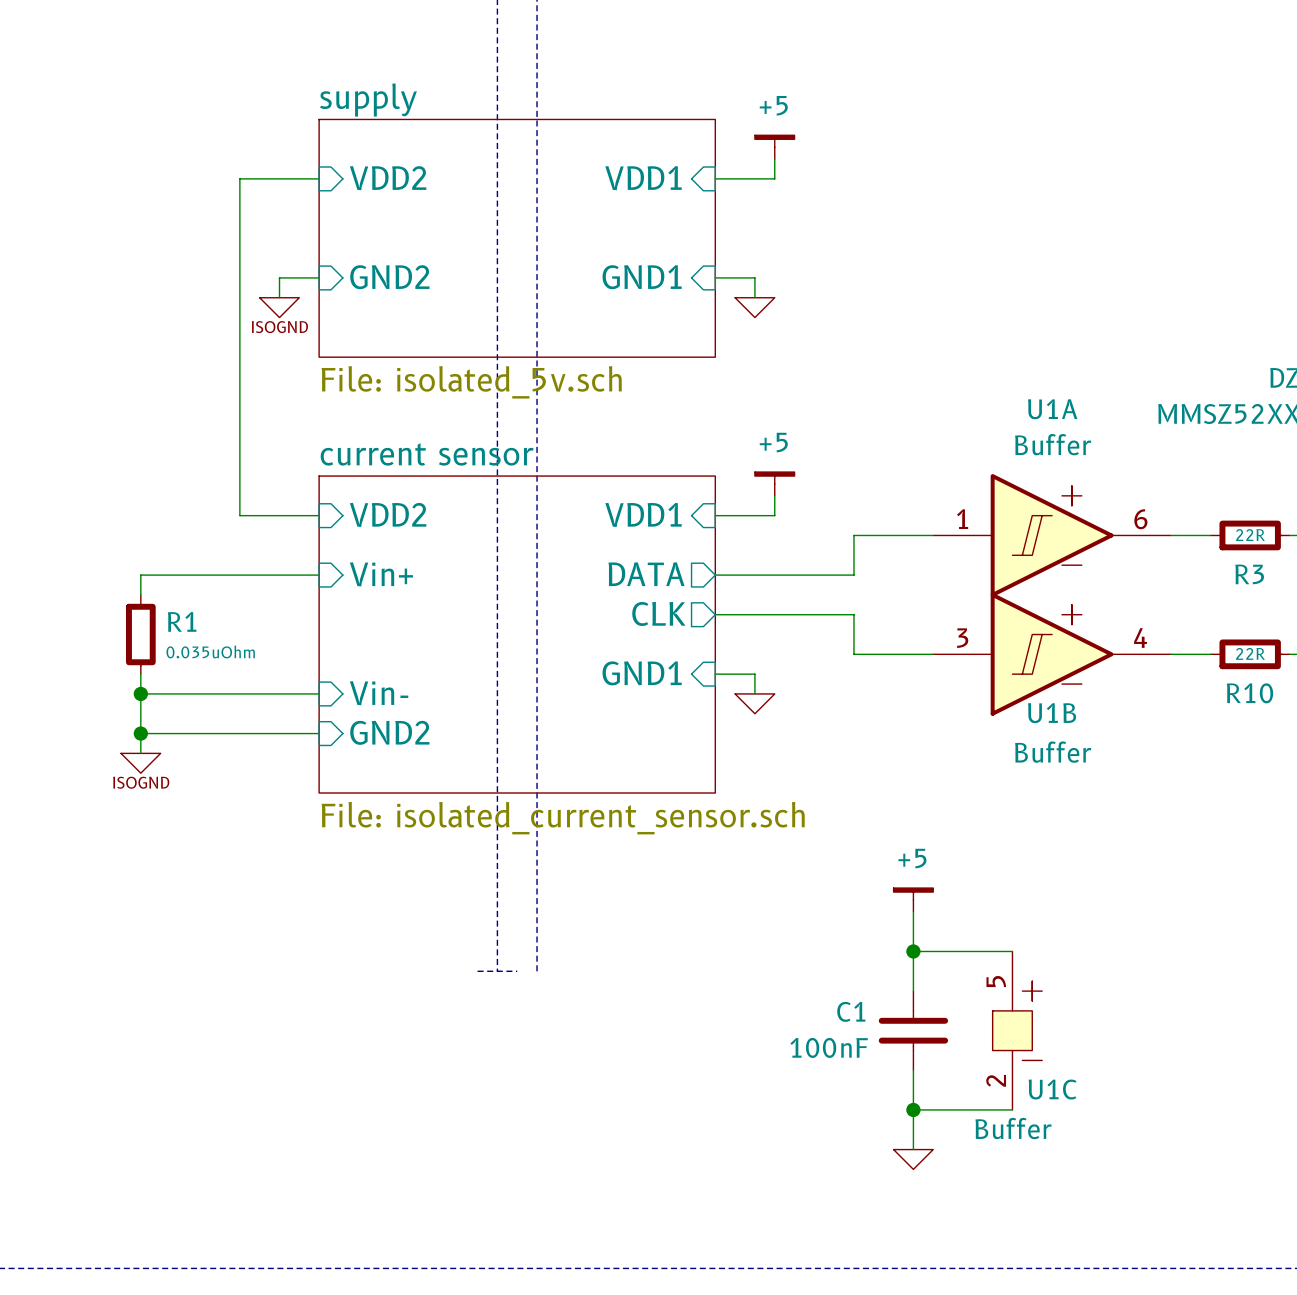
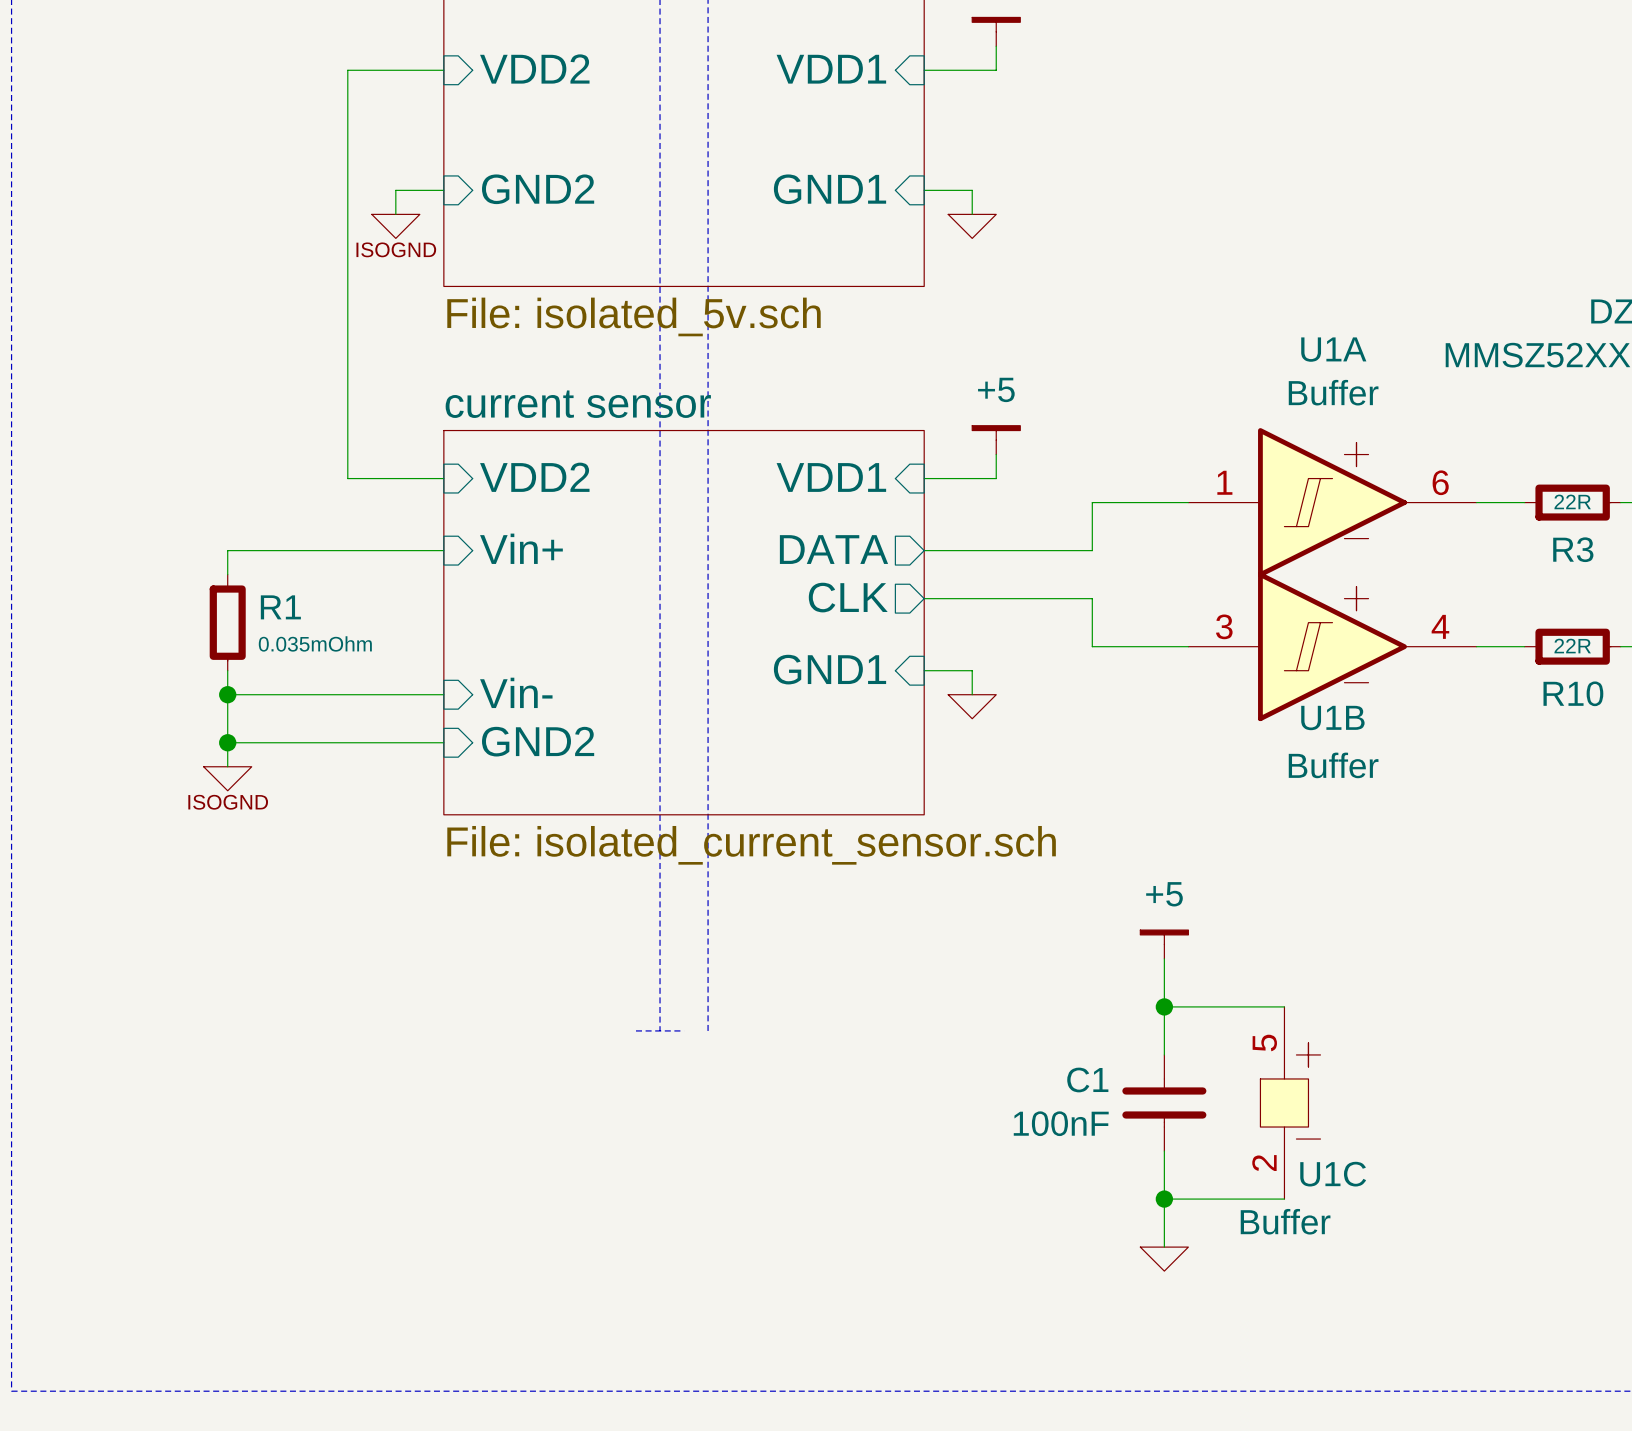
R1 value: 0.035uOhm (210, 651) -> 0.035mOhm (315, 643)

